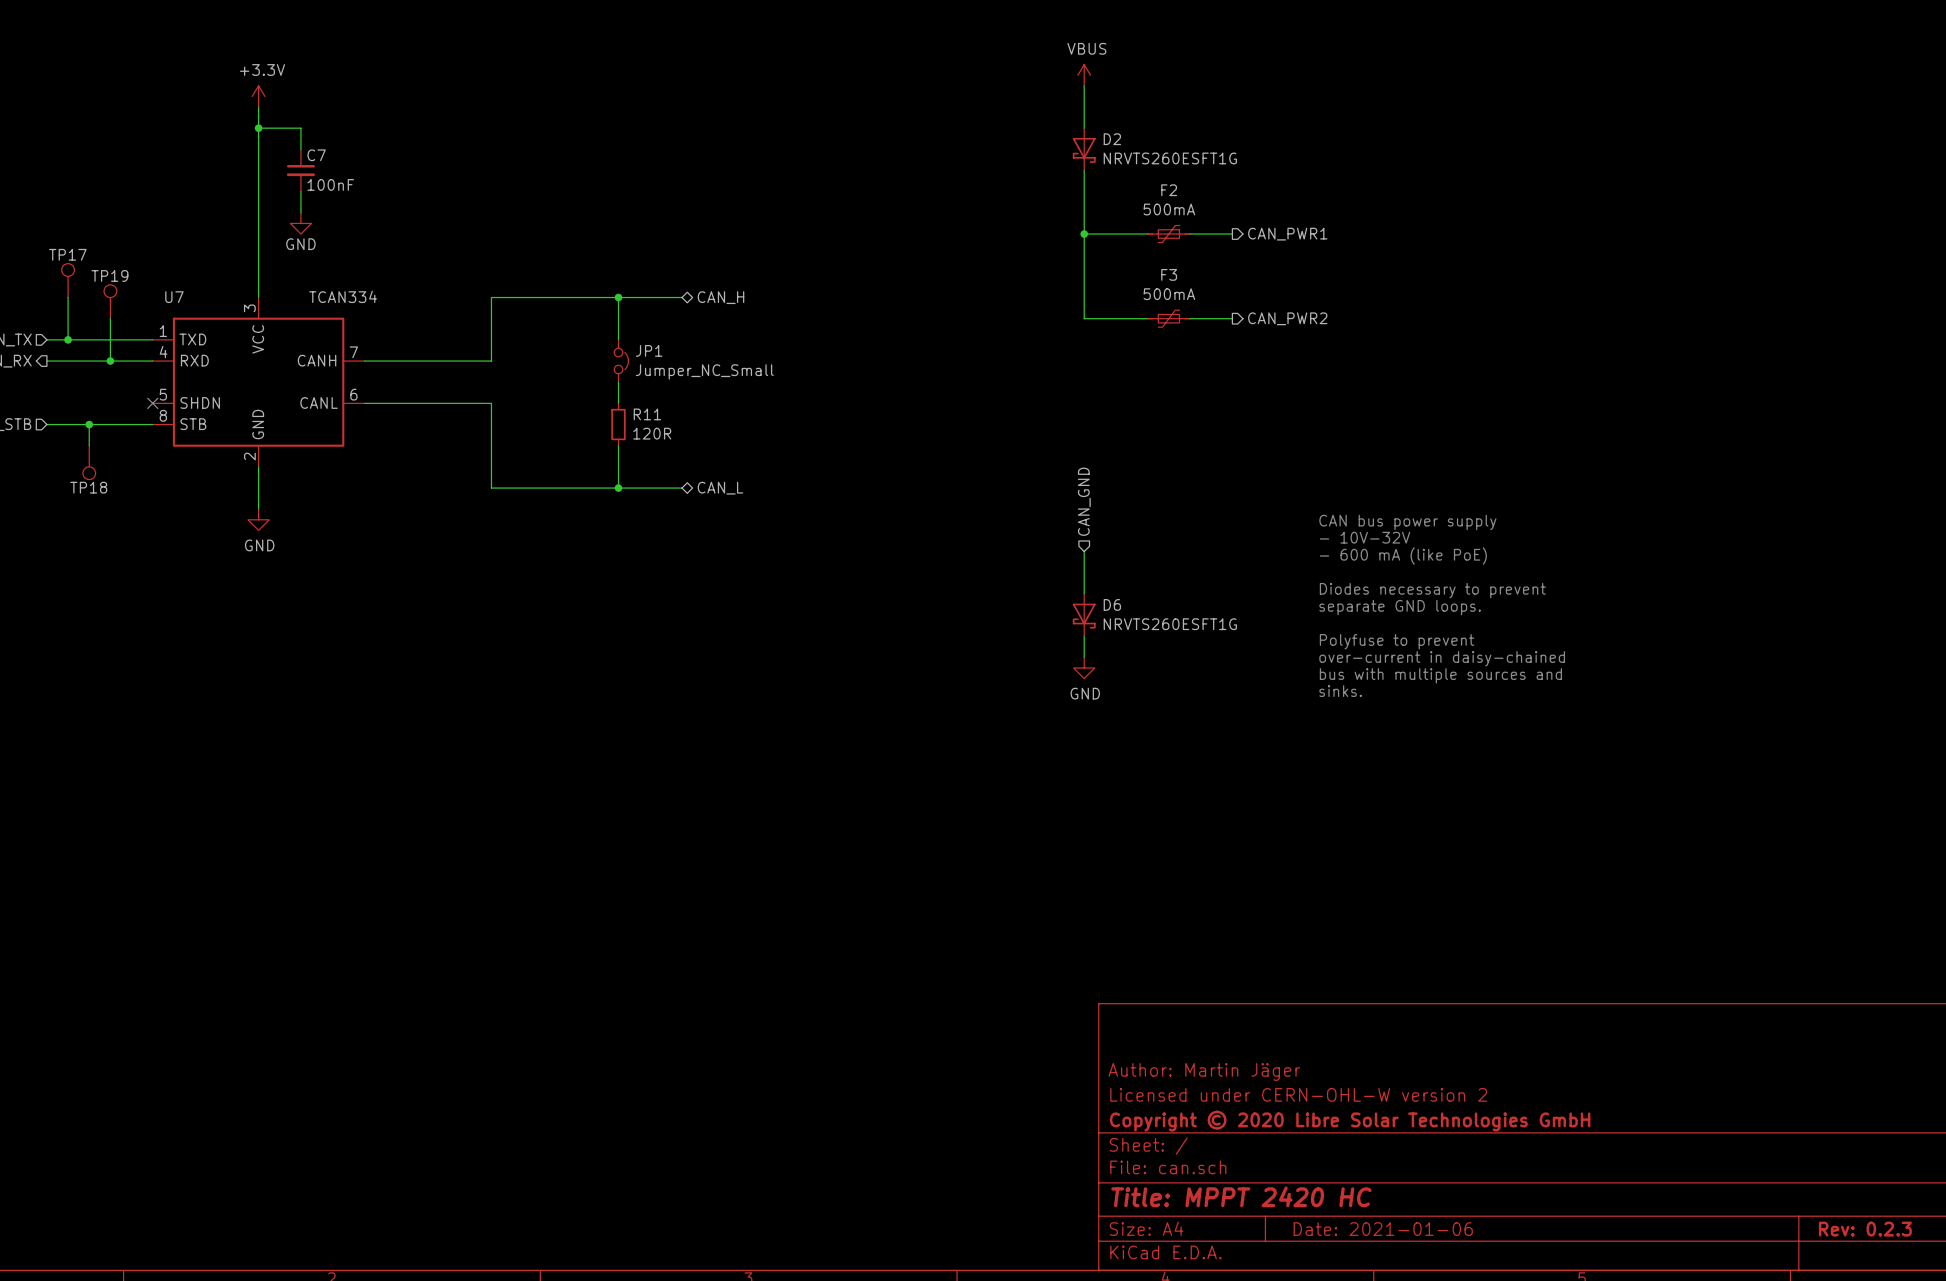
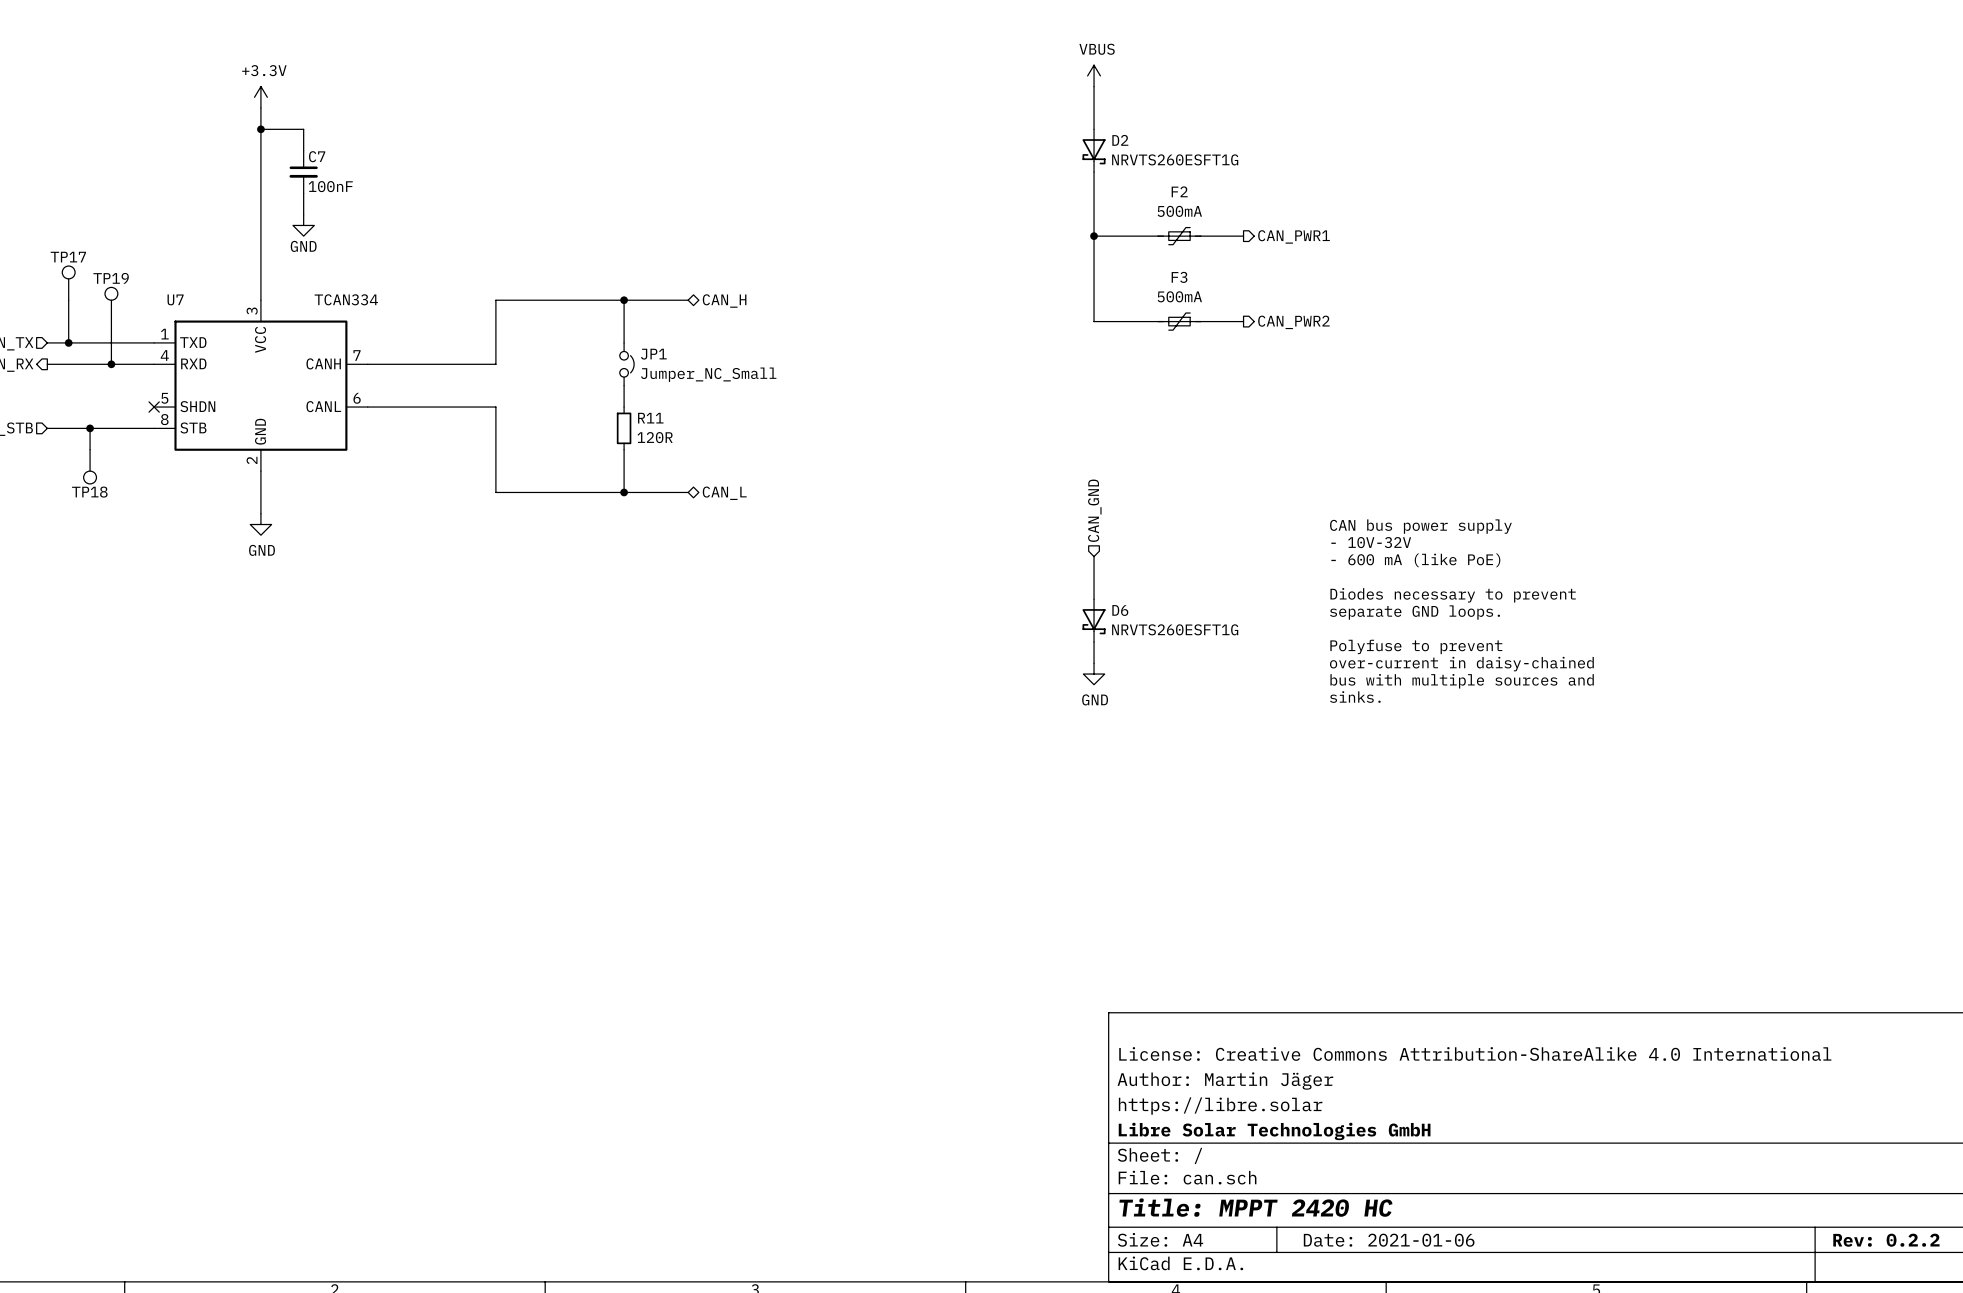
title block: none -> License: Creative Commons Attribution-ShareAlike 4.0 International (1475, 1053)
title block: Licensed under CERN-OHL-W version 2 (1298, 1094) -> https://libre.solar (1220, 1106)
title block: Copyright © 2020 Libre Solar Technologies GmbH (1350, 1121) -> Libre Solar Technologies GmbH (1274, 1131)
title block: Rev: 0.2.3 (1865, 1229) -> Rev: 0.2.2 (1886, 1240)

